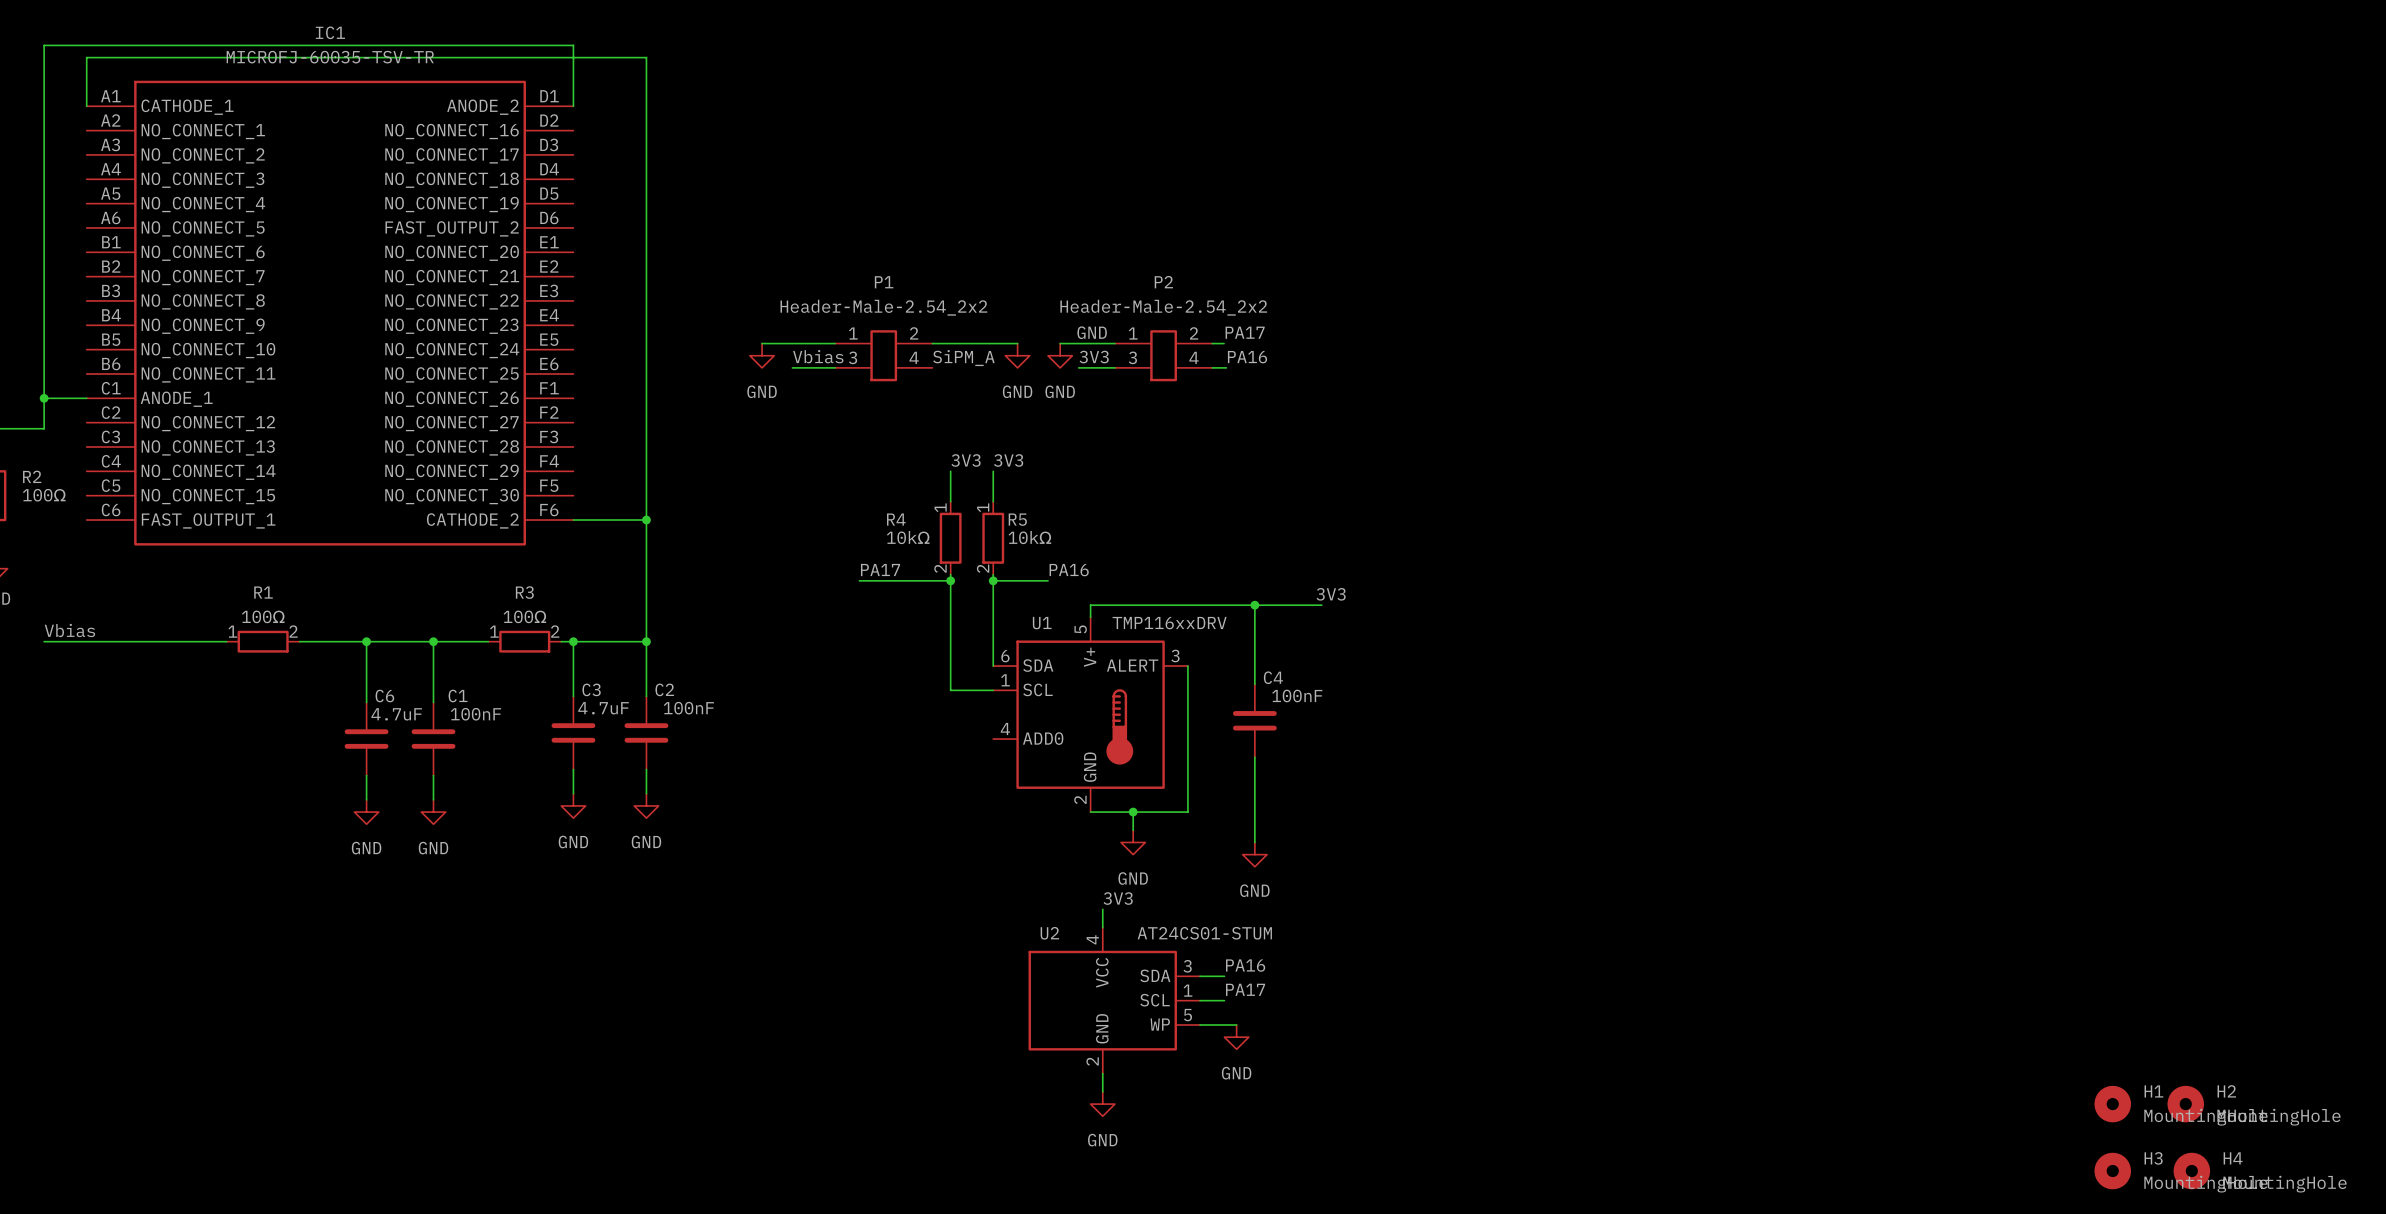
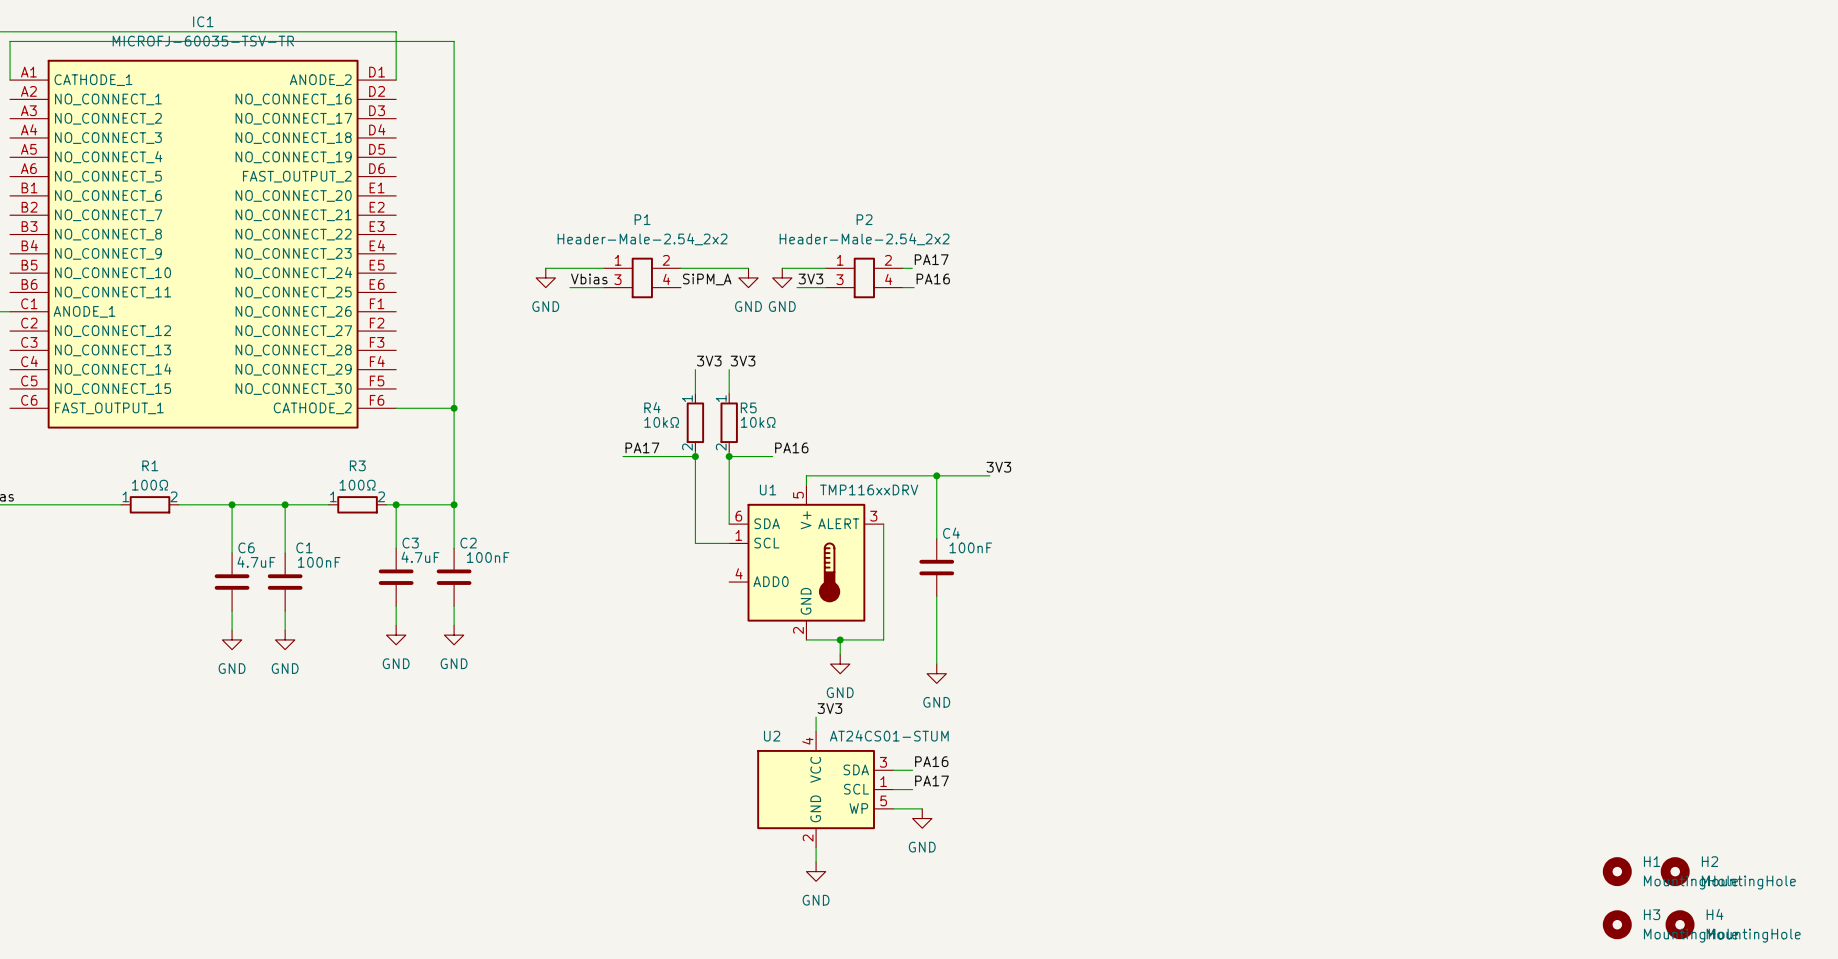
label: GND (1092, 332) -> none

